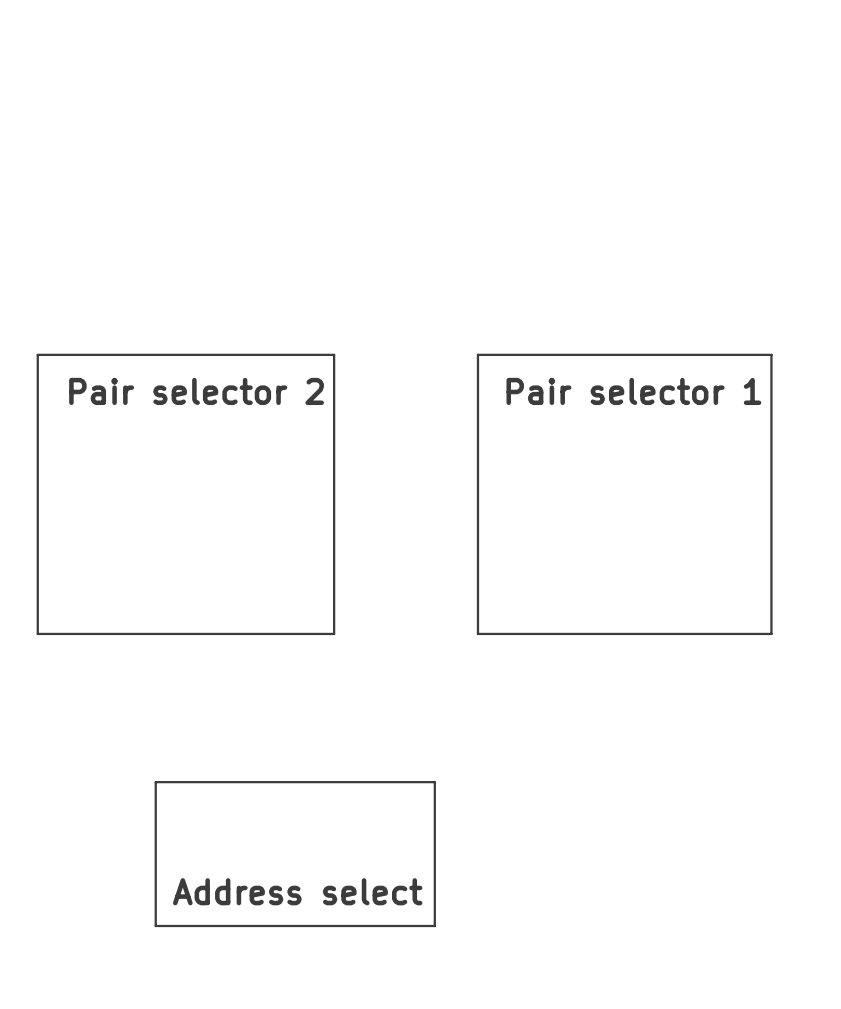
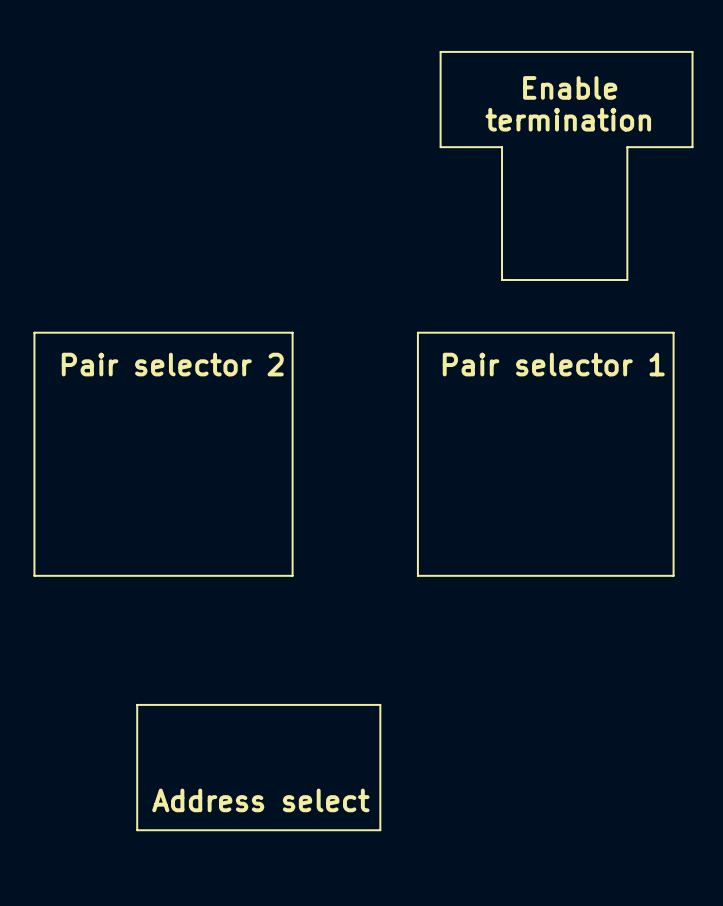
line: none -> (692, 51) (692, 147) (627, 147) (627, 280) (502, 280) (502, 147) (440, 147) (440, 51) (692, 51)
text: none -> Enable (570, 87)
text: none -> termination (568, 119)

